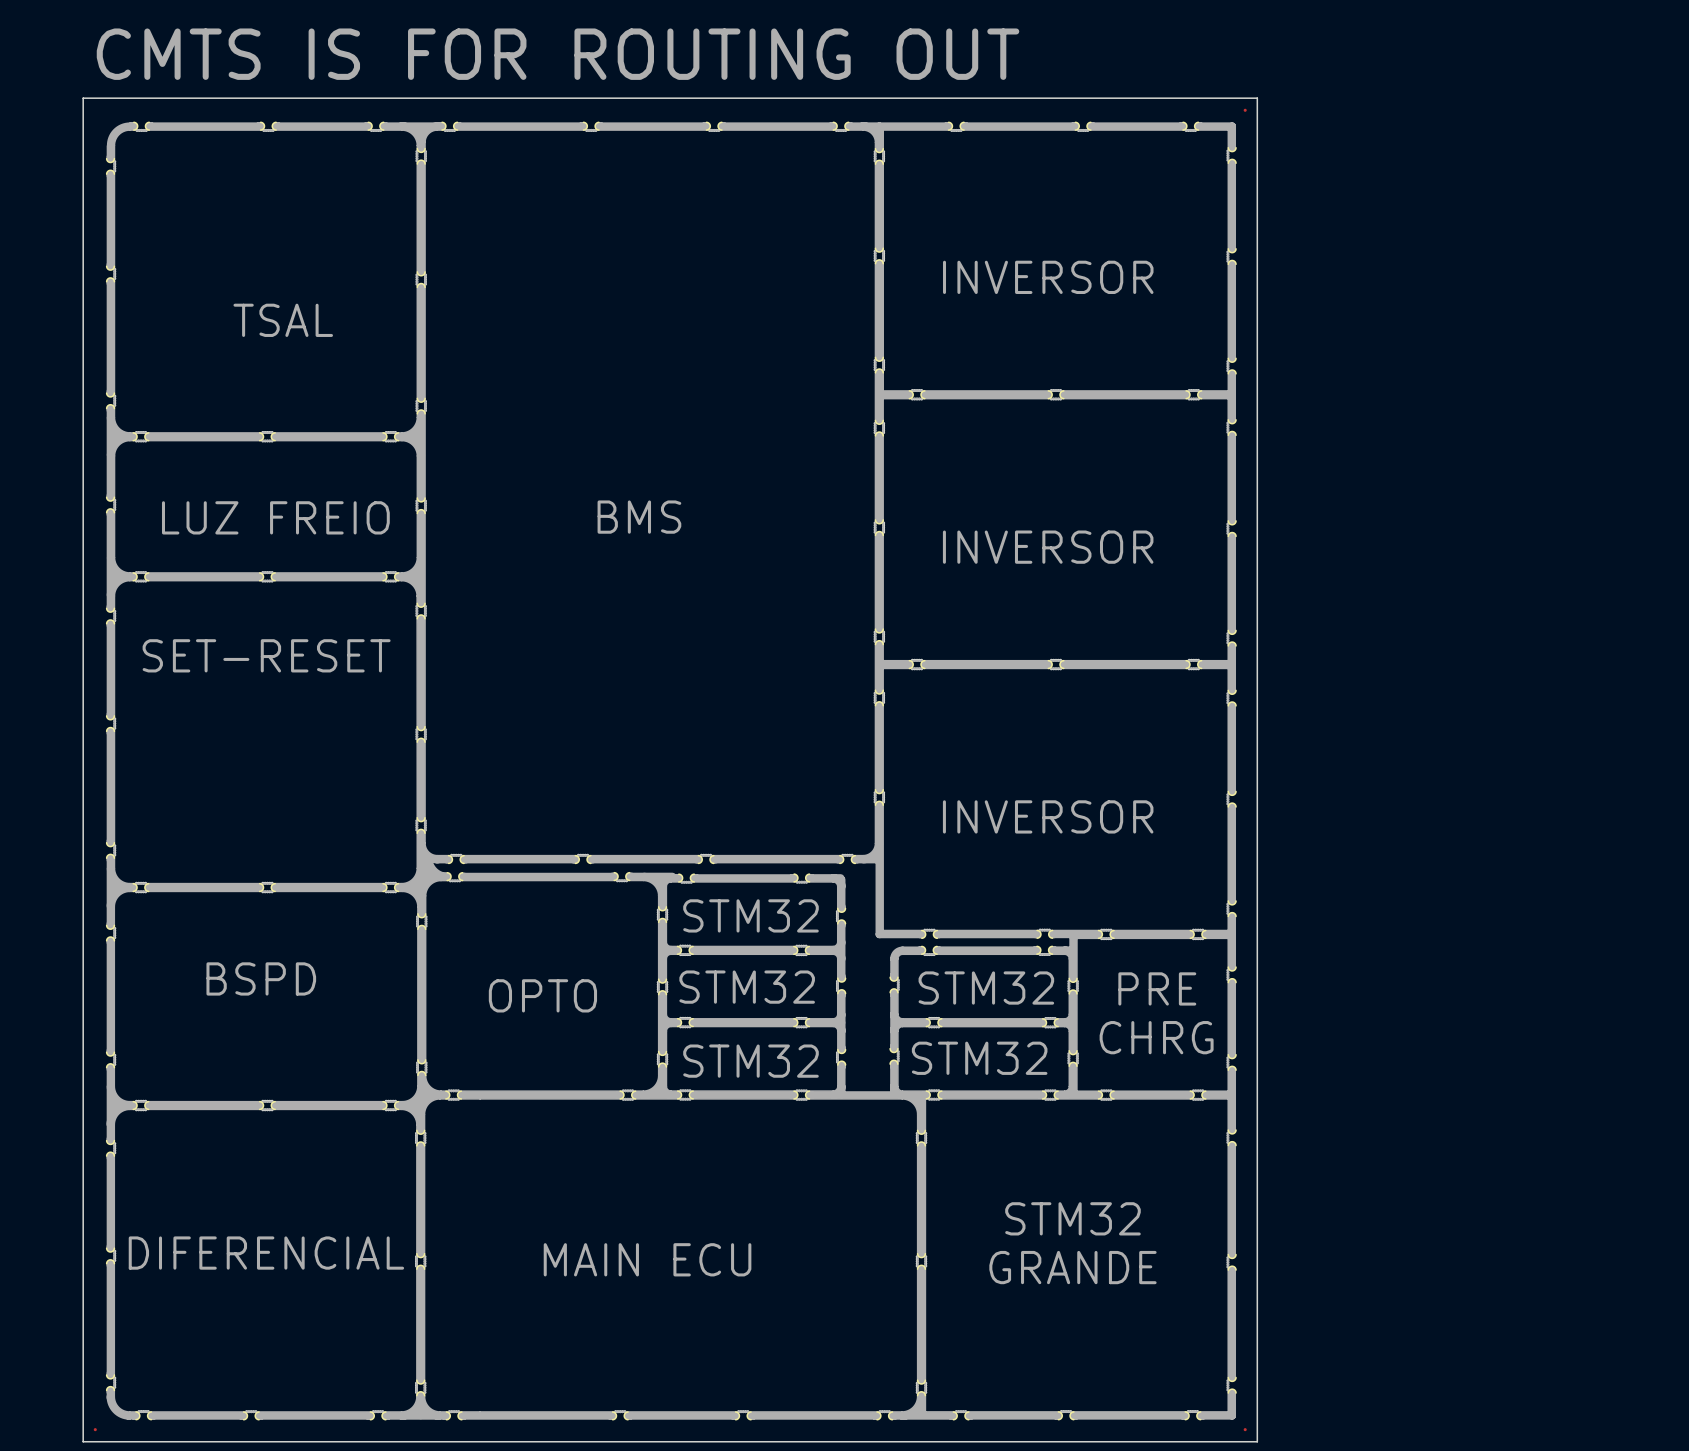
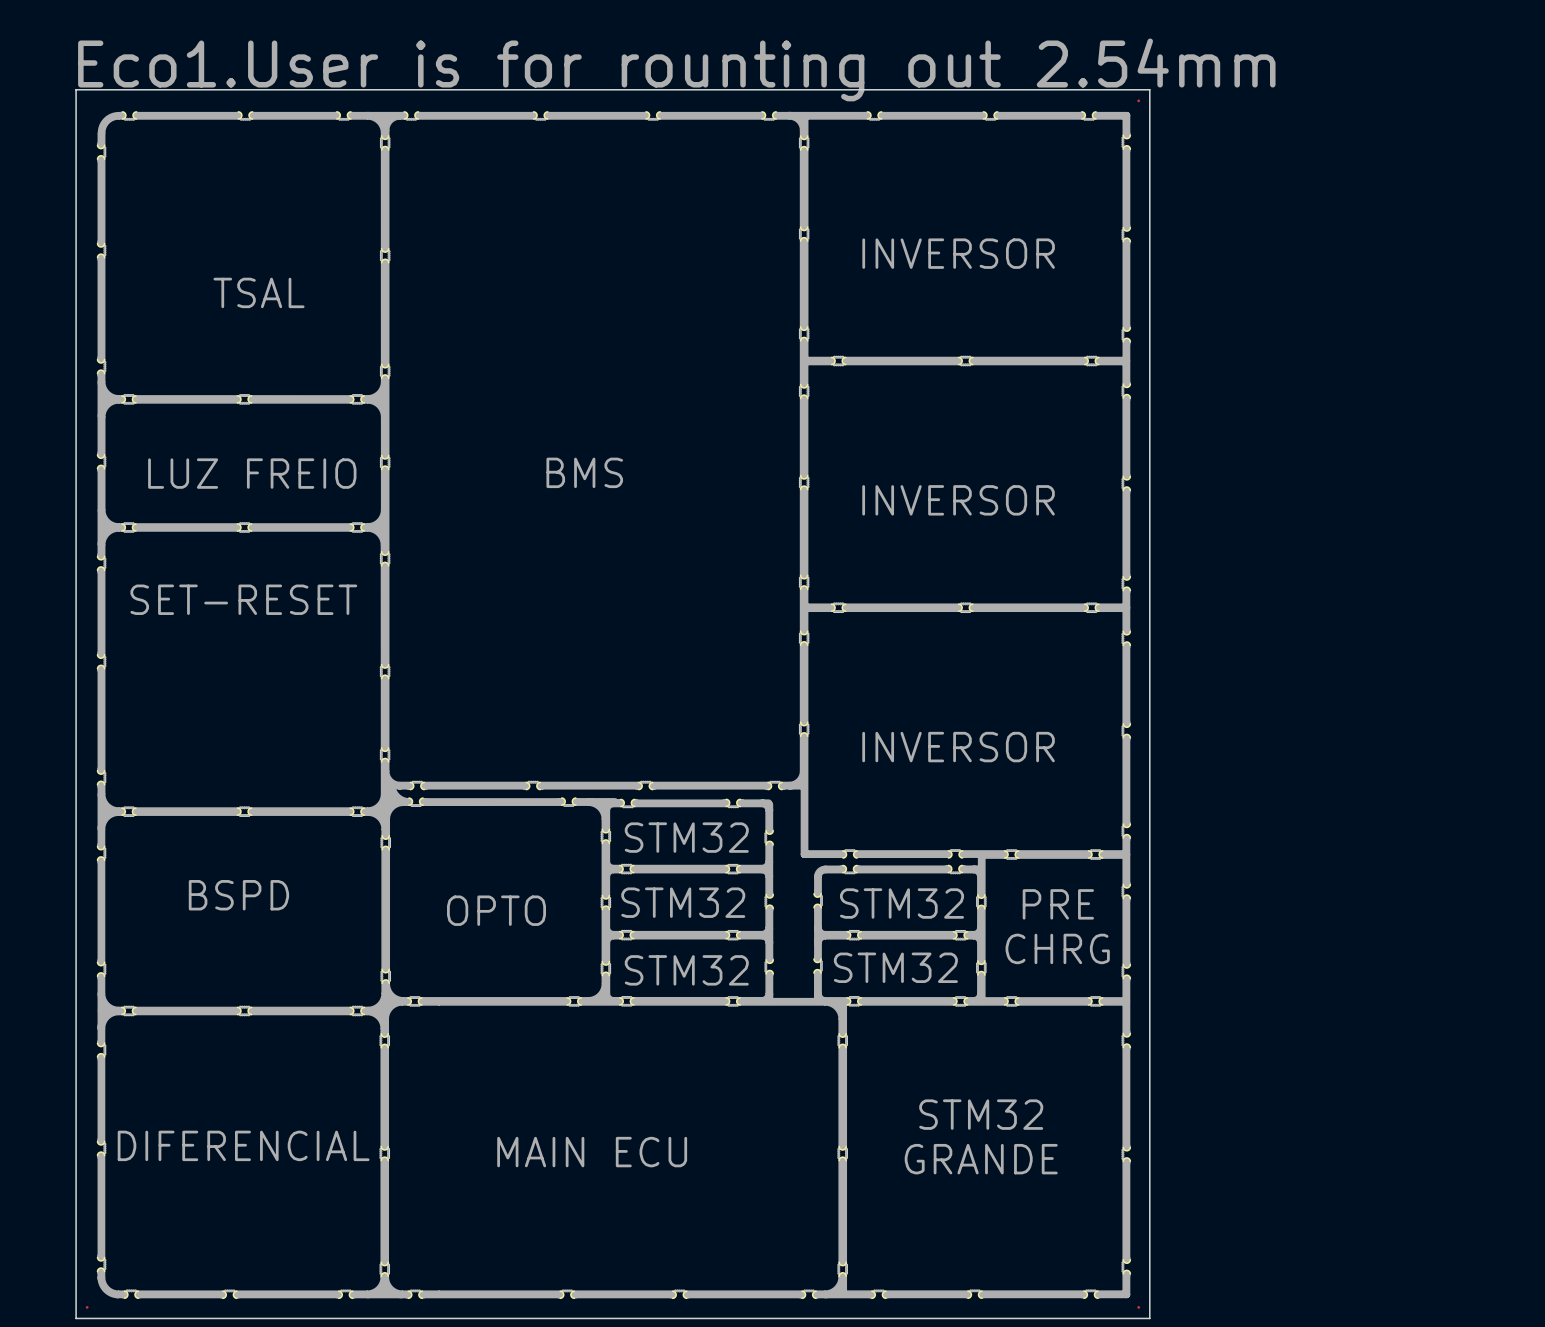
text: CMTS IS FOR ROUTING OUT (558, 54) -> none
text: none -> Eco1.User is for rounting out 2.54mm (676, 69)

